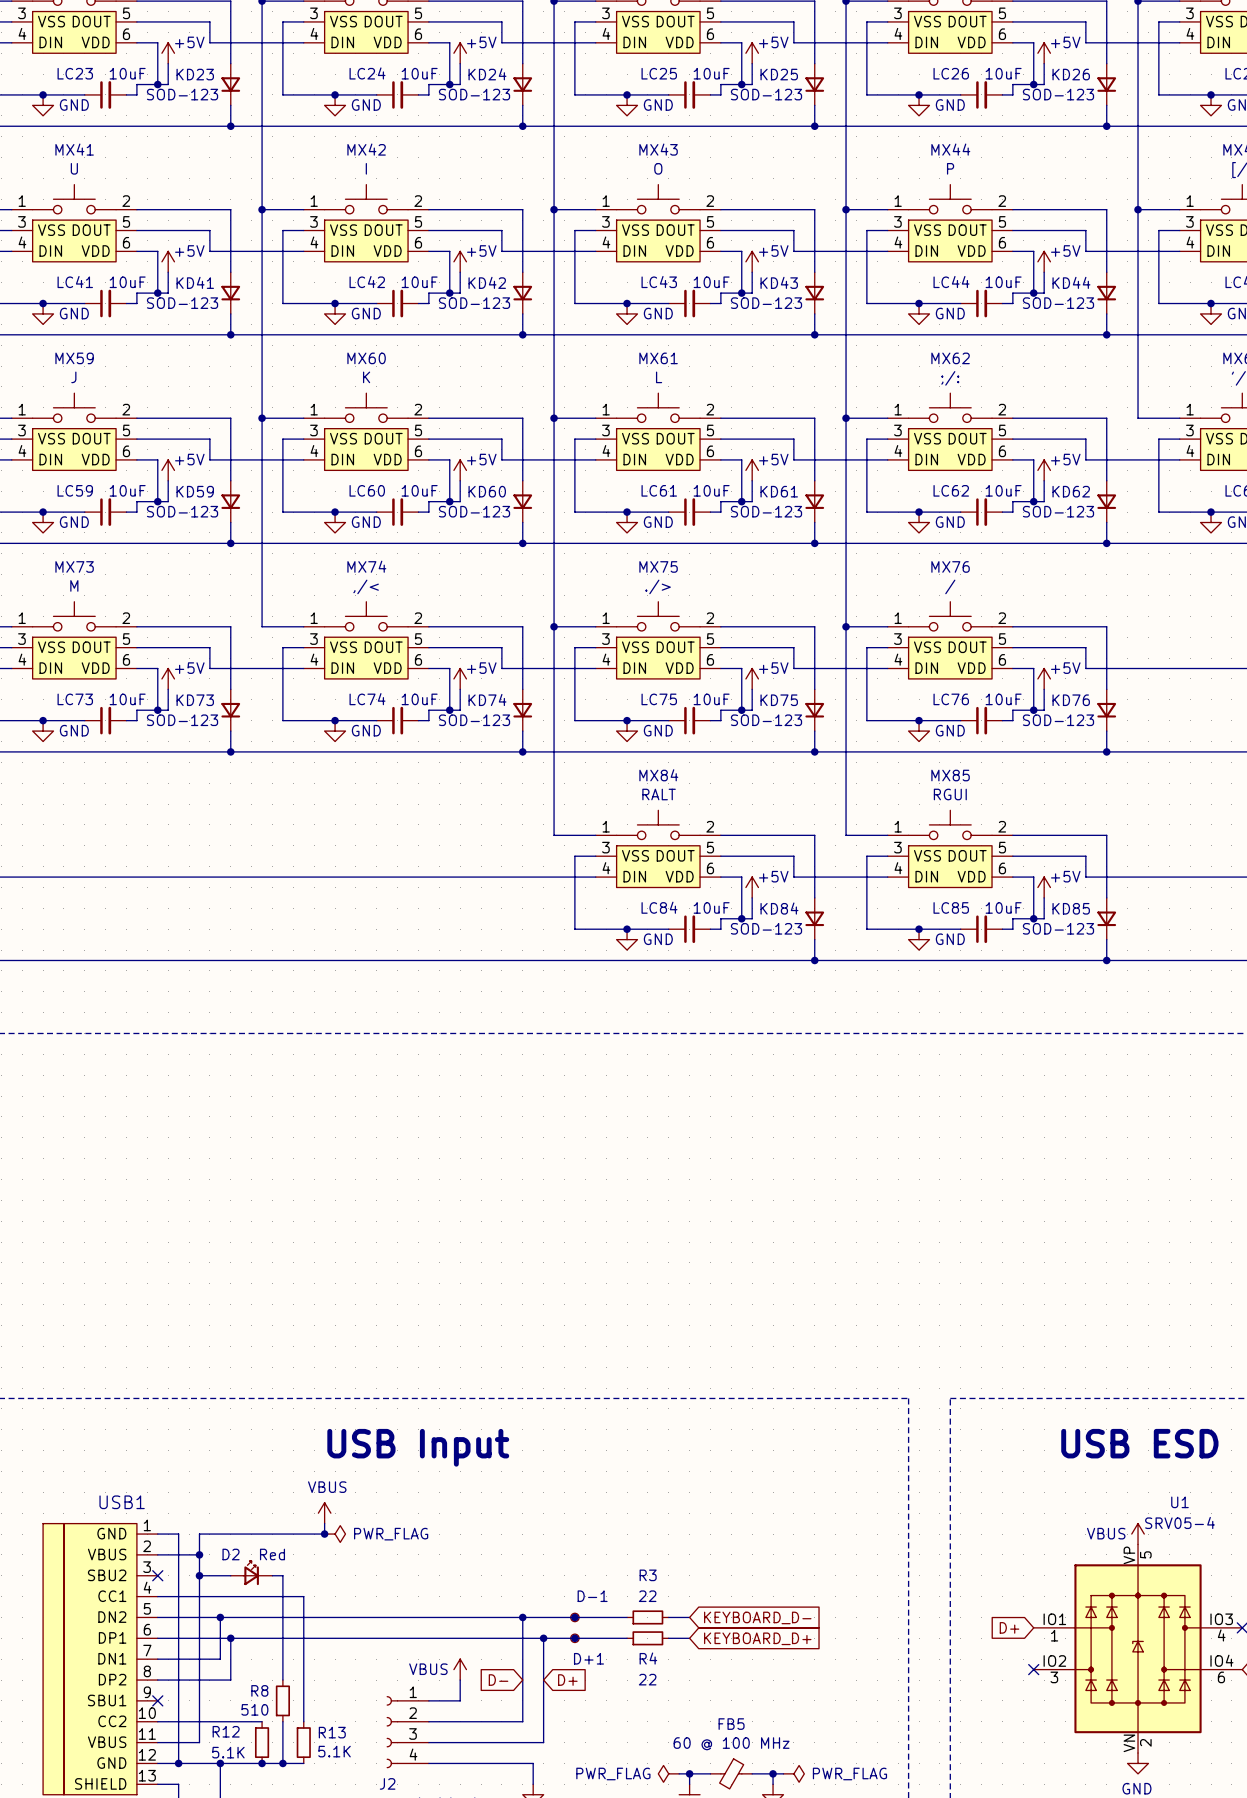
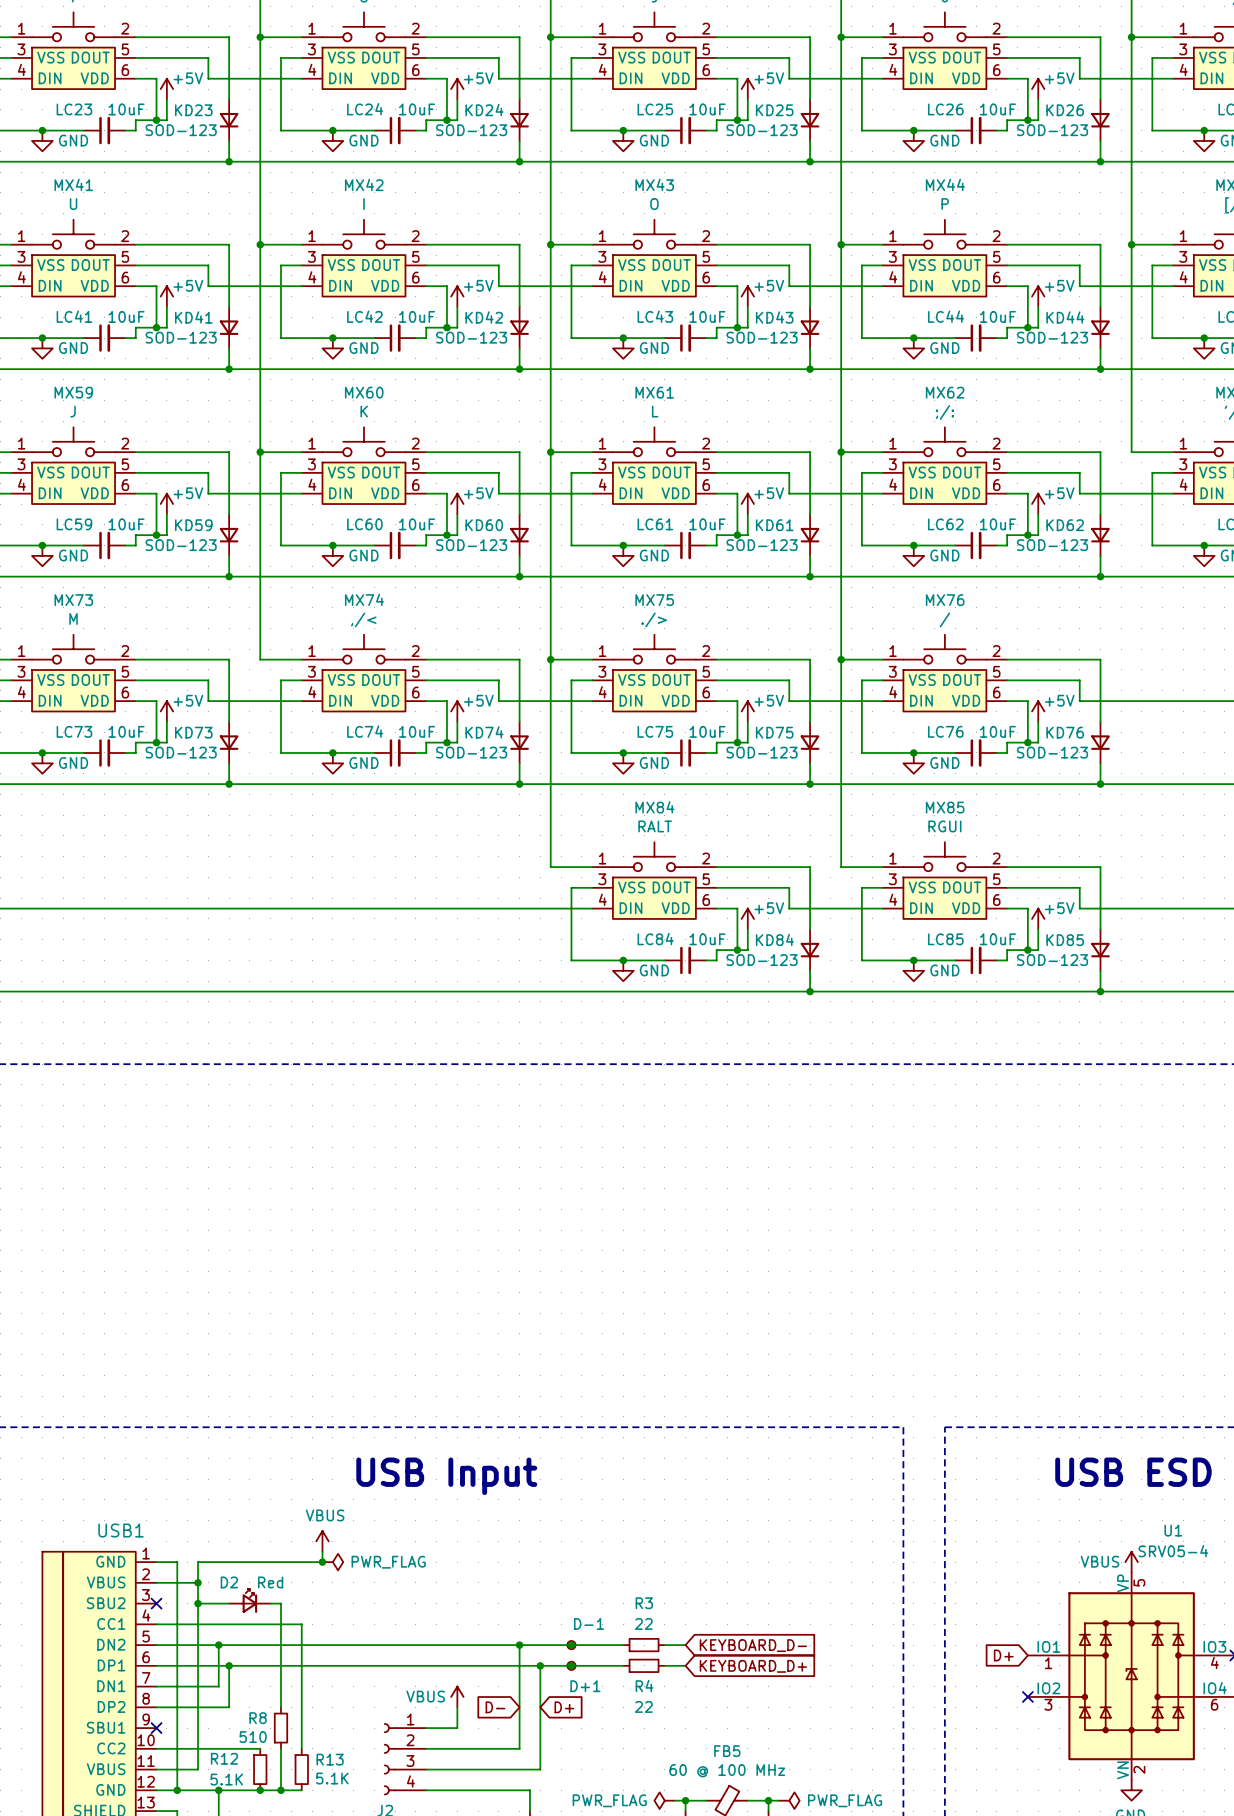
text position: USB Input (418, 1447) -> USB Input (446, 1476)

